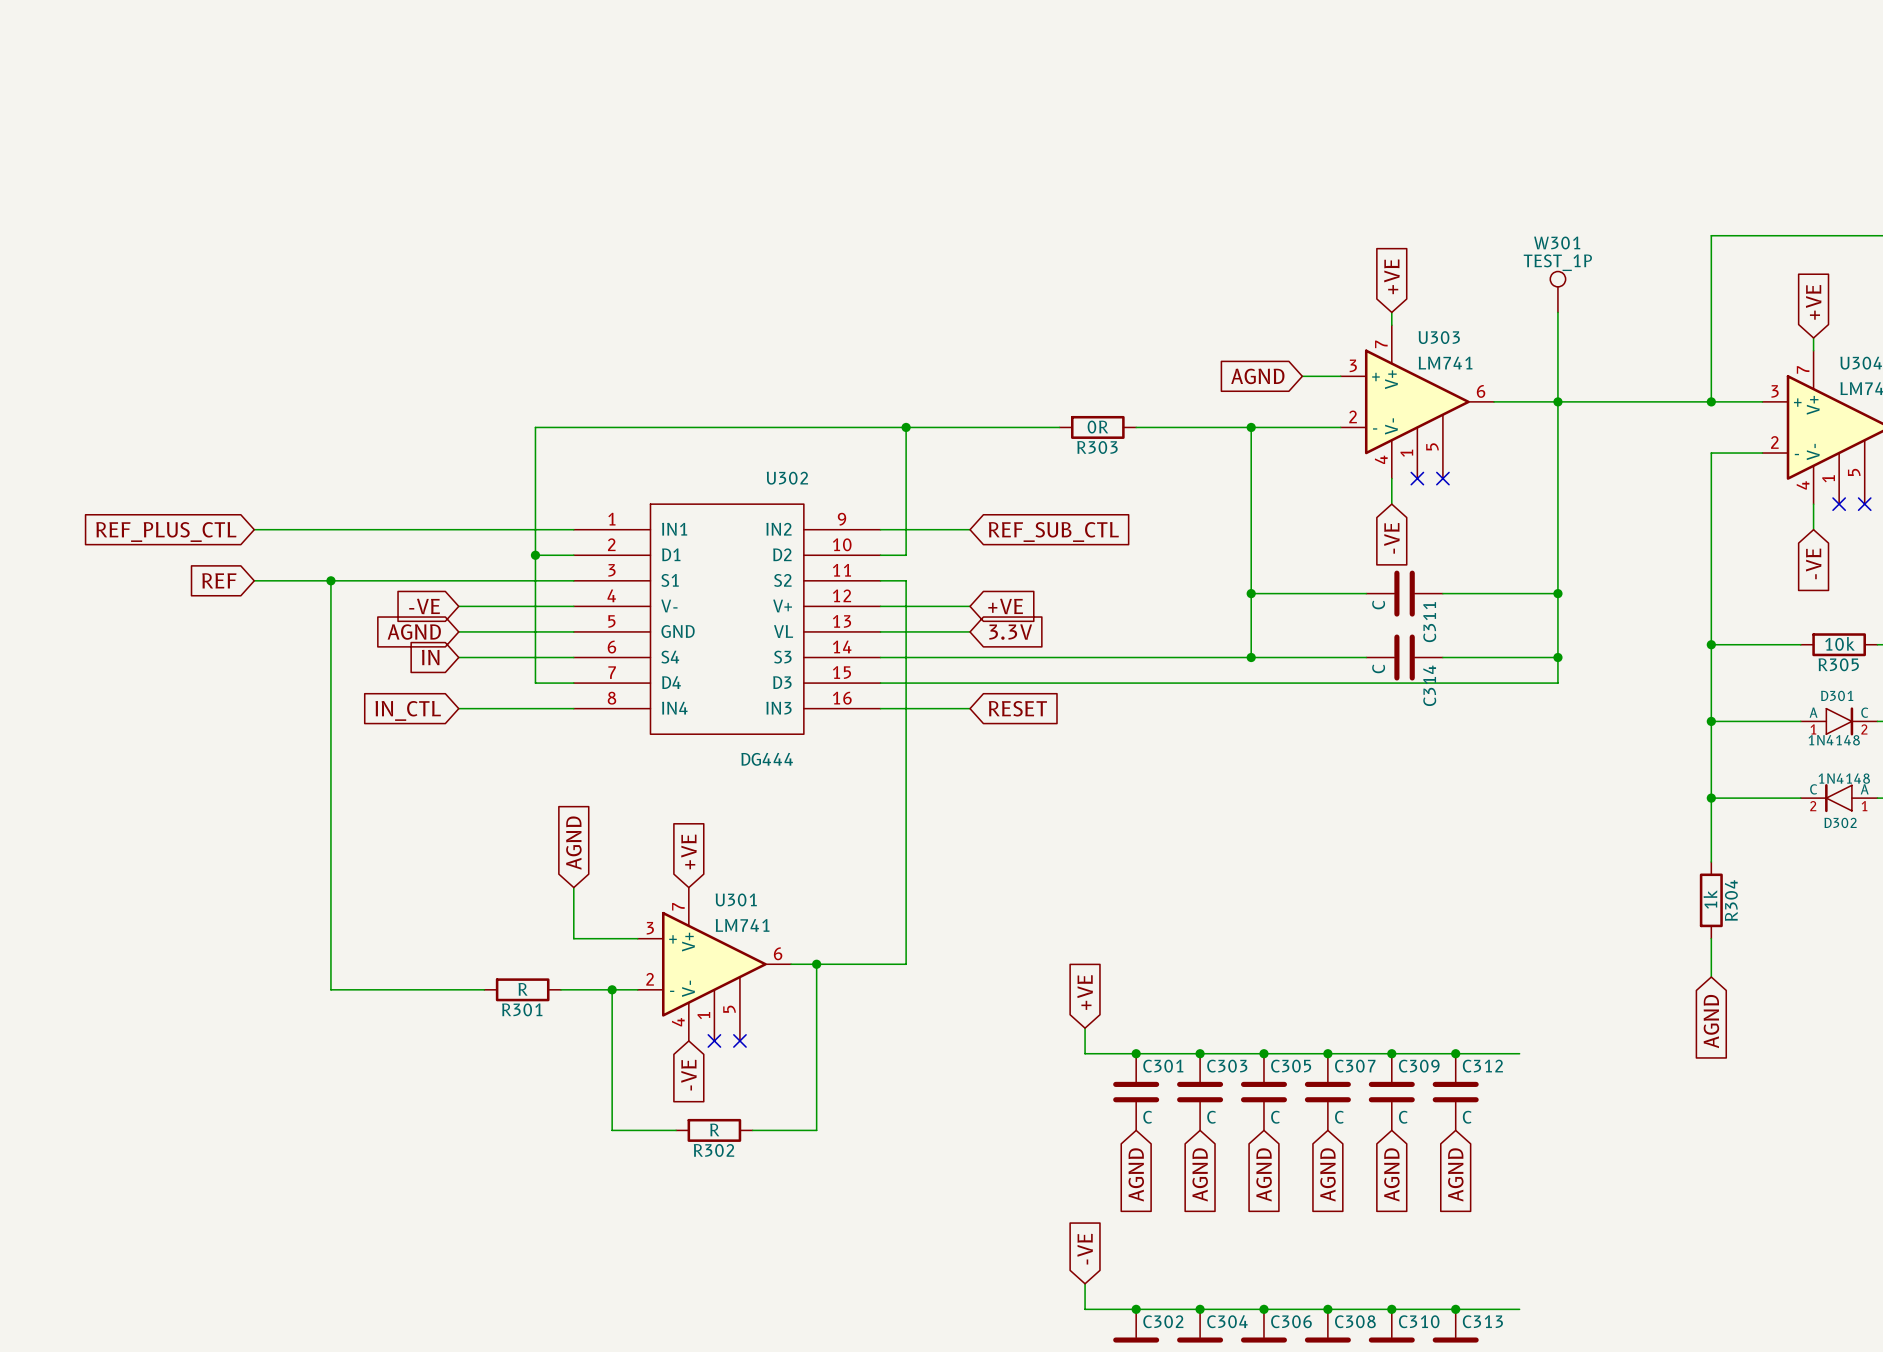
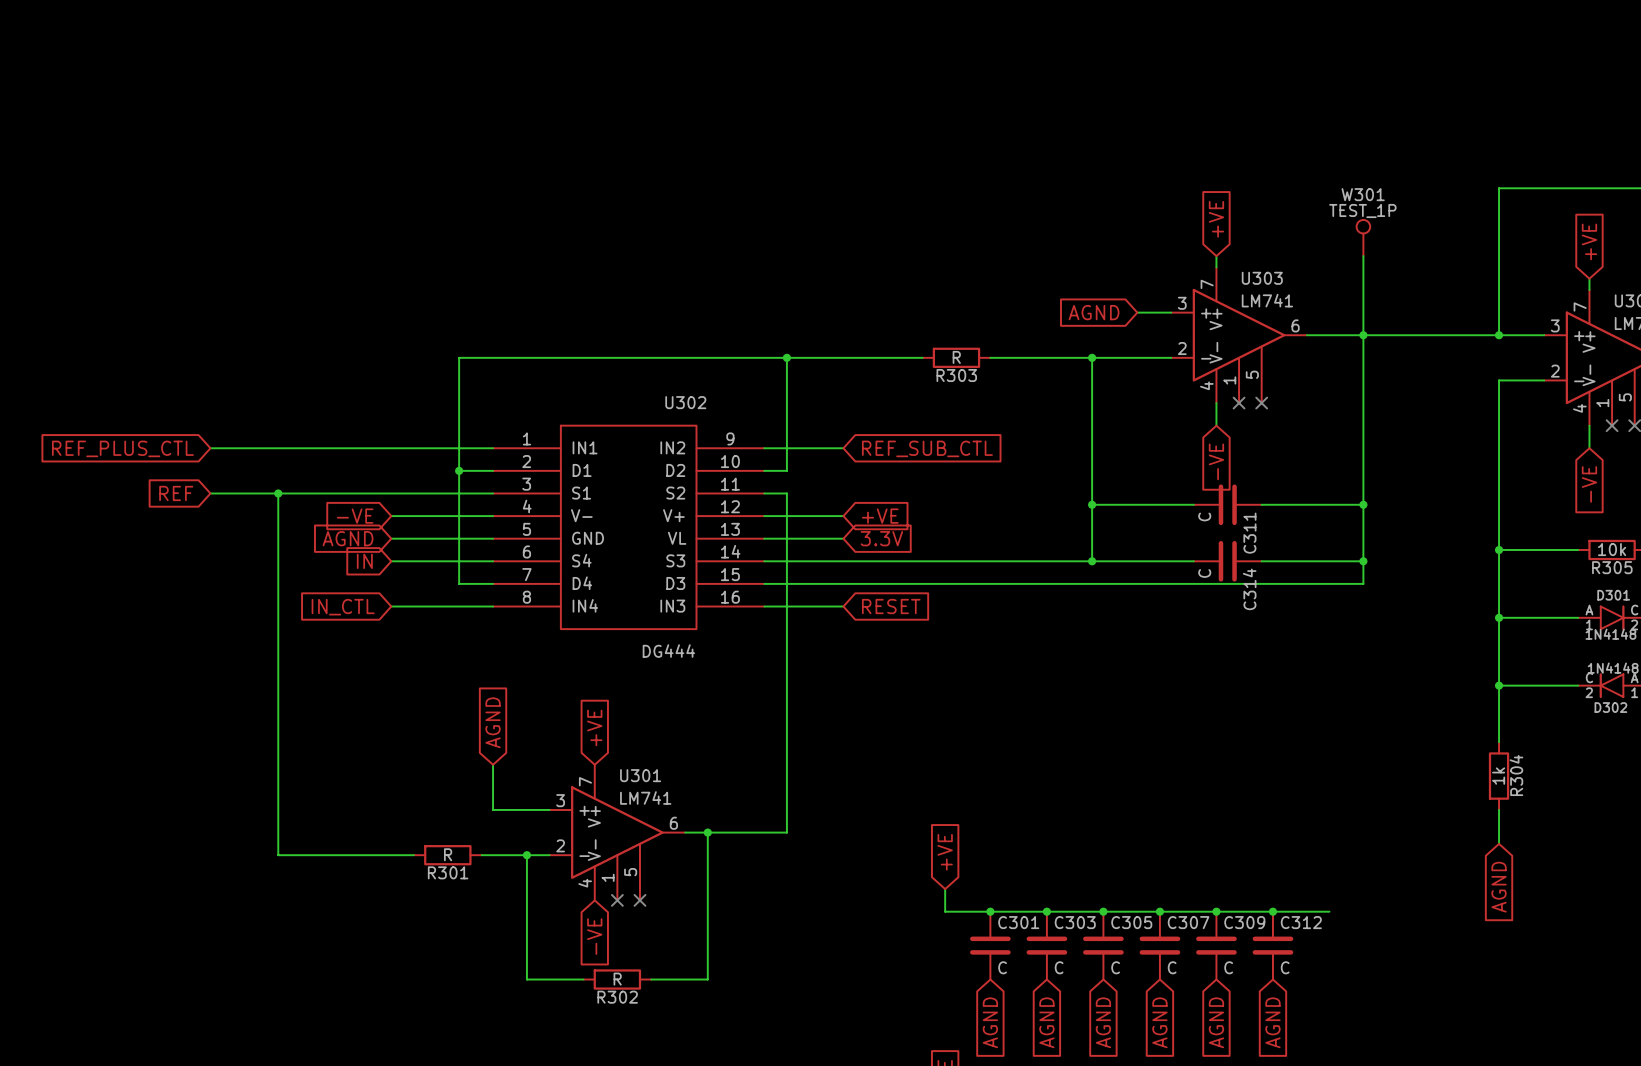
R303 value: 0R (1097, 427) -> R (956, 357)

